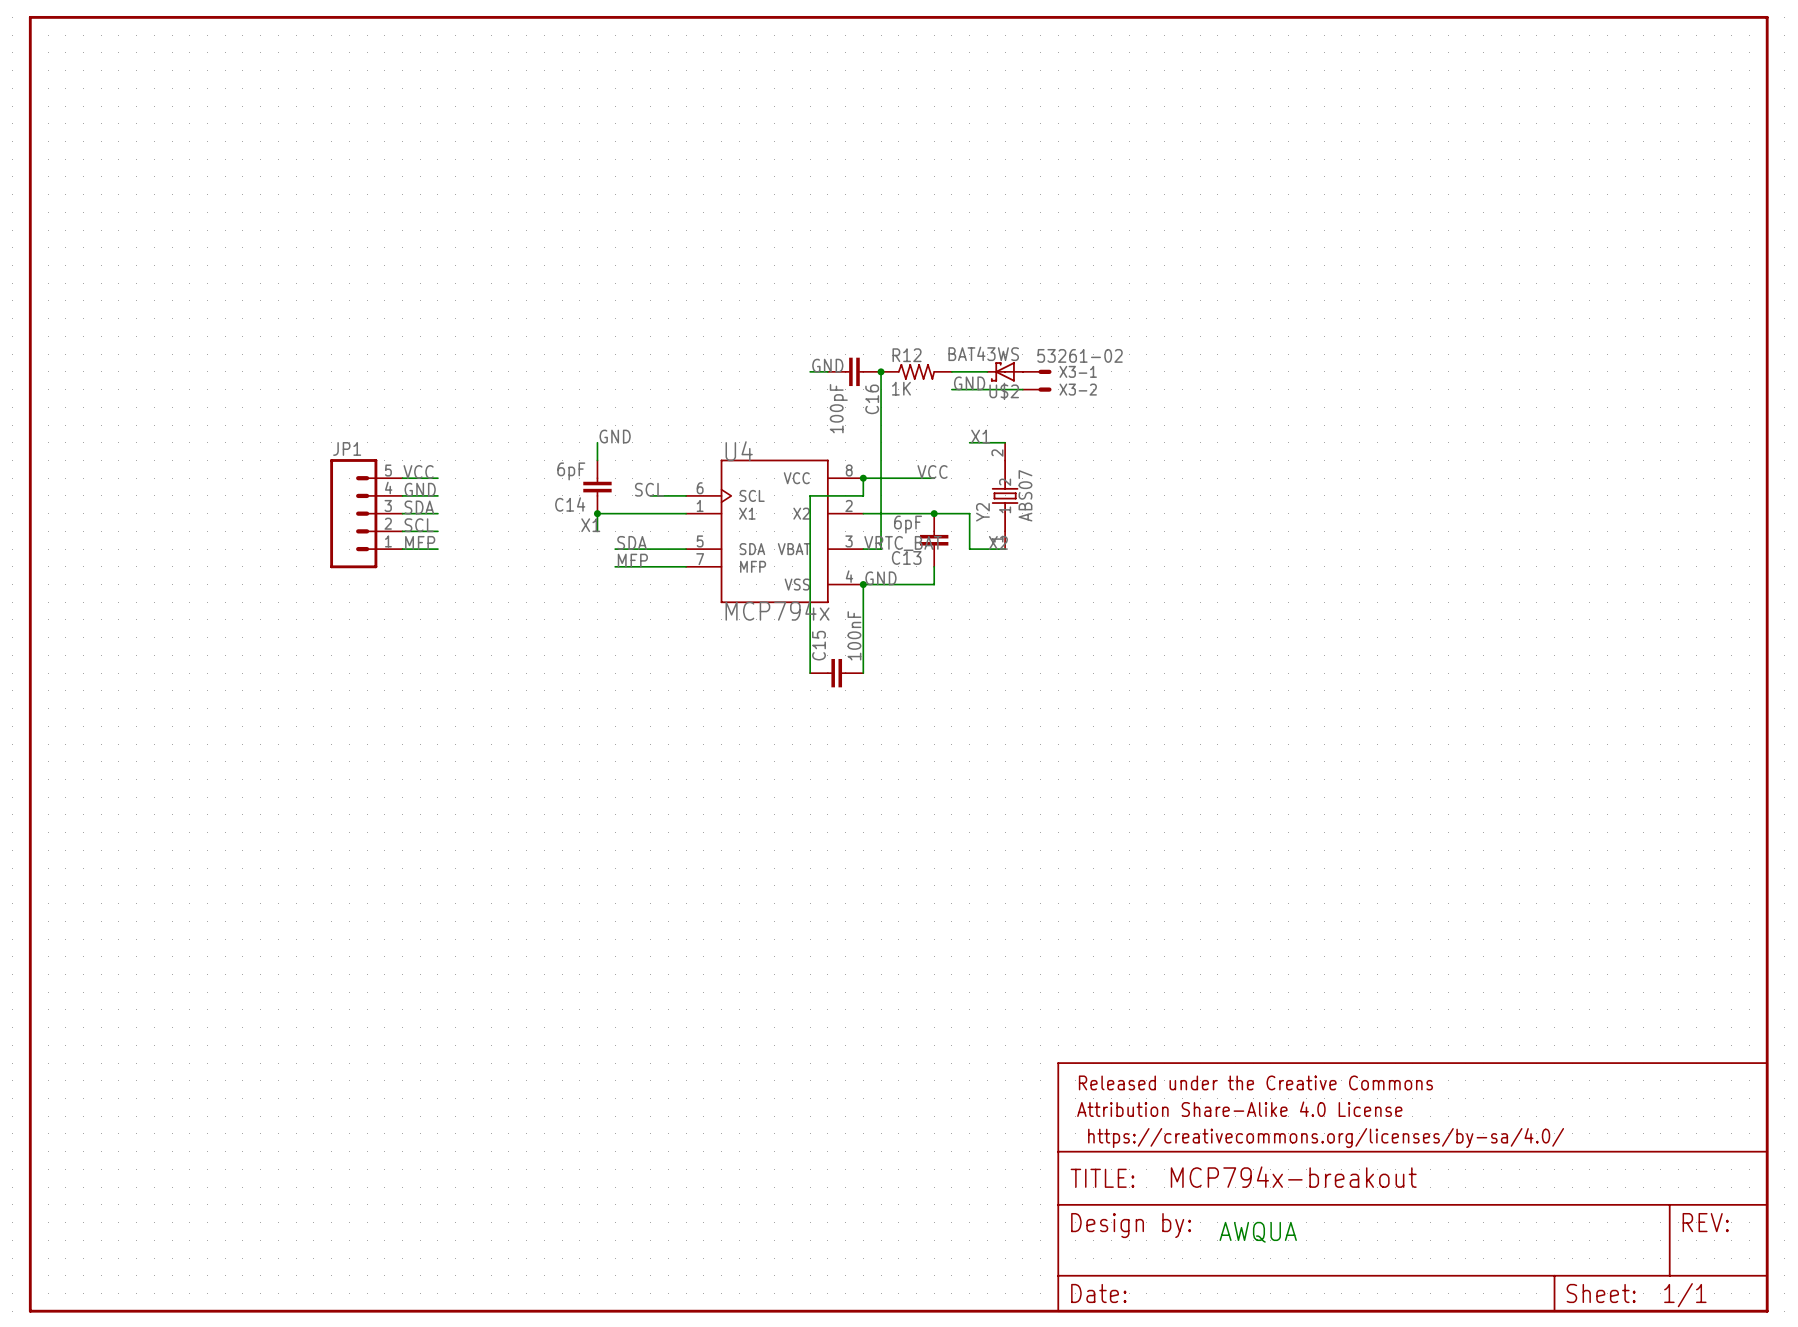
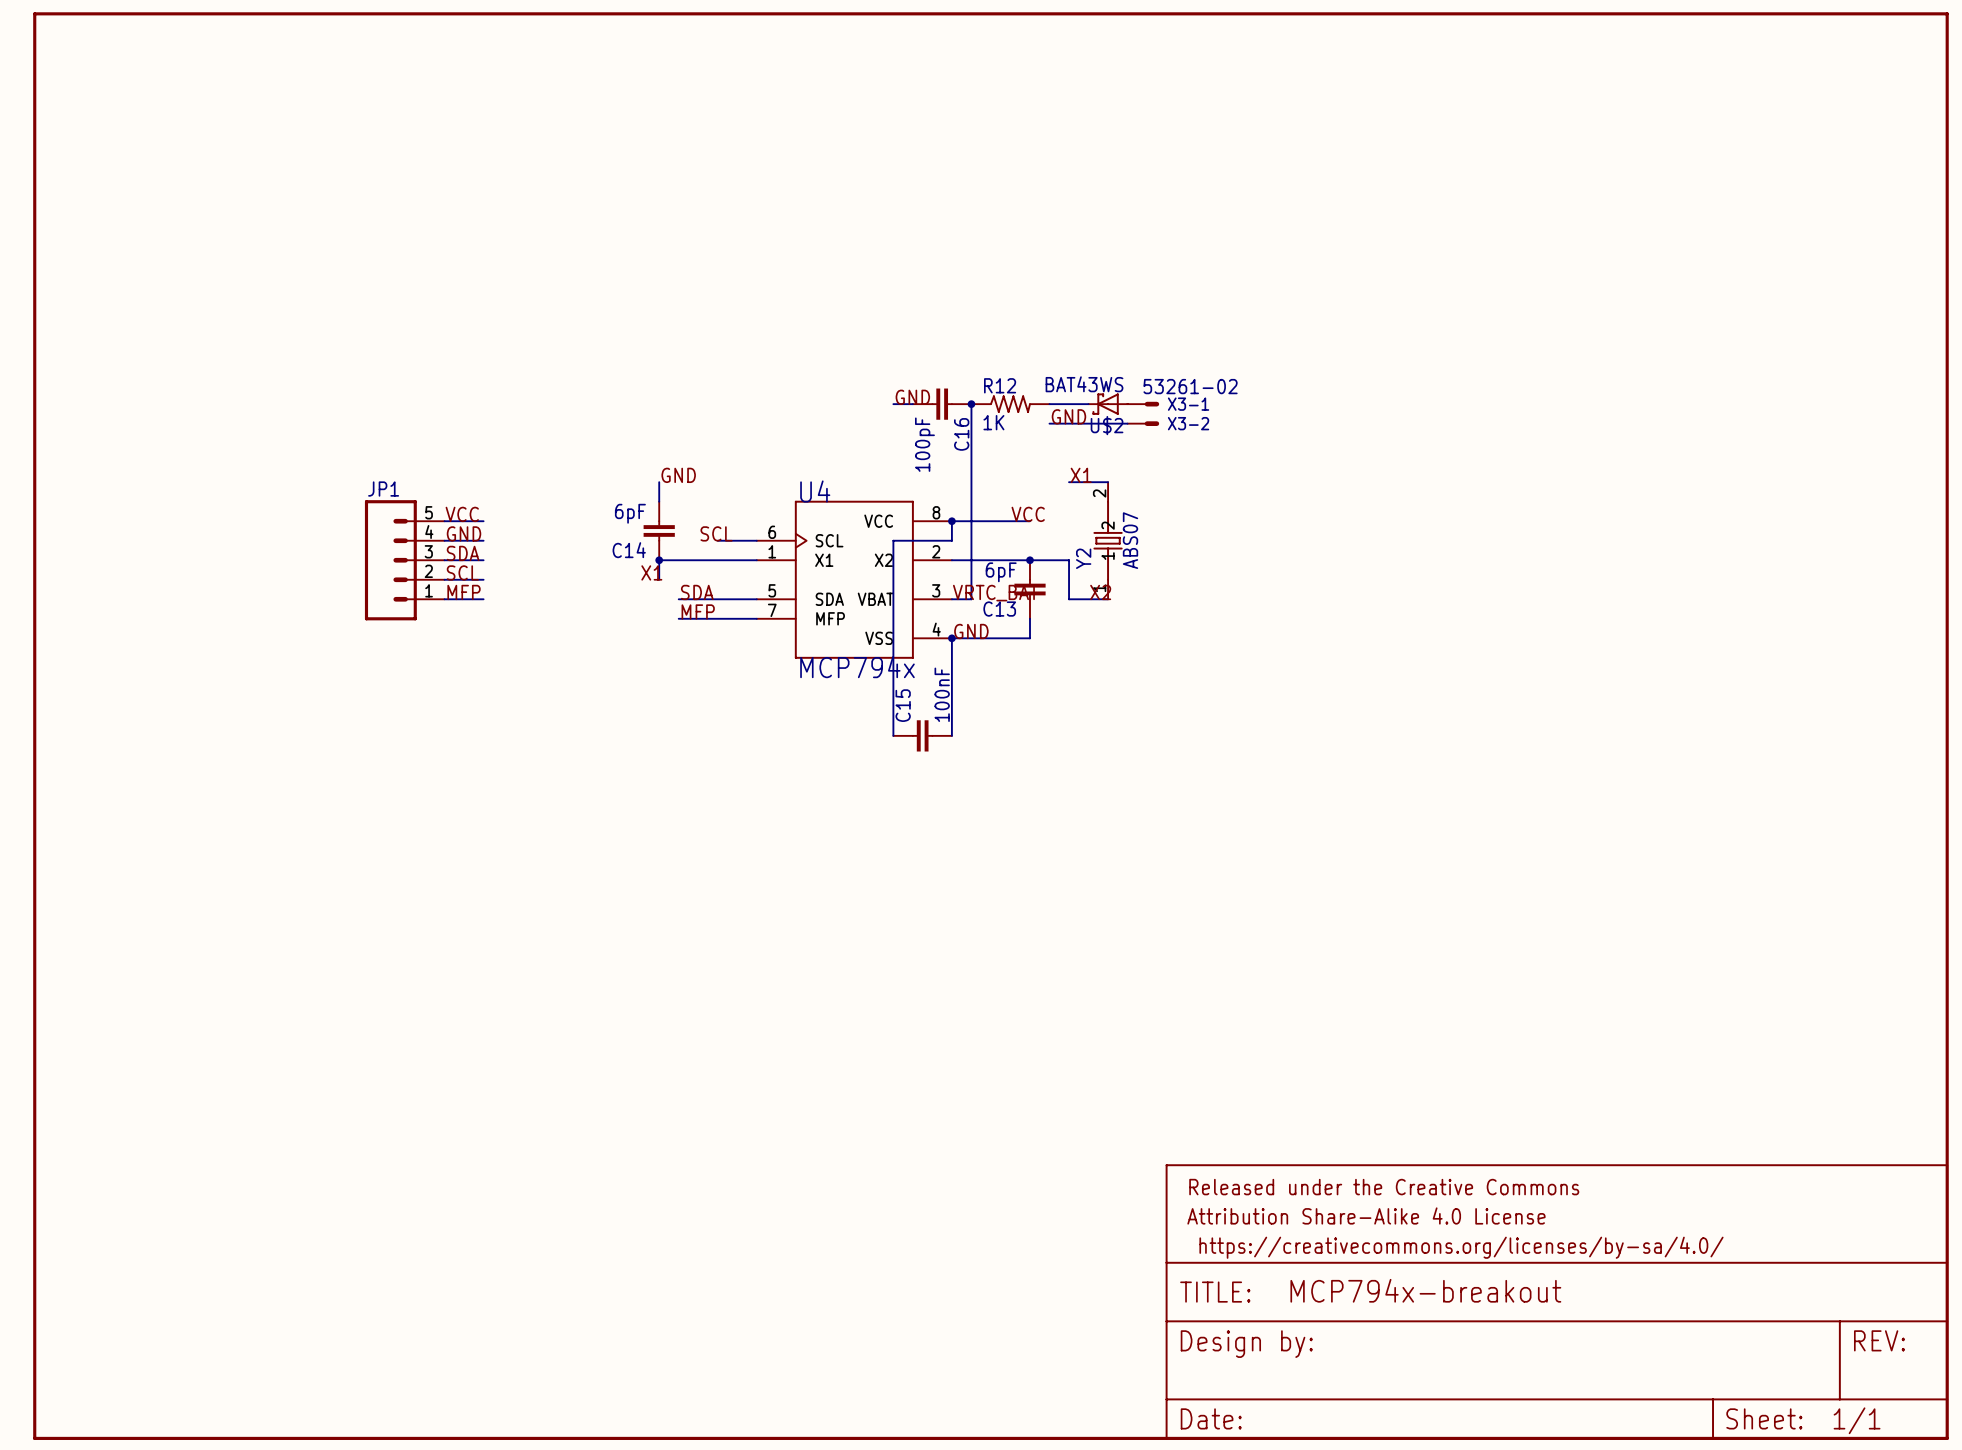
text: AWQUA (1258, 1232) -> none

